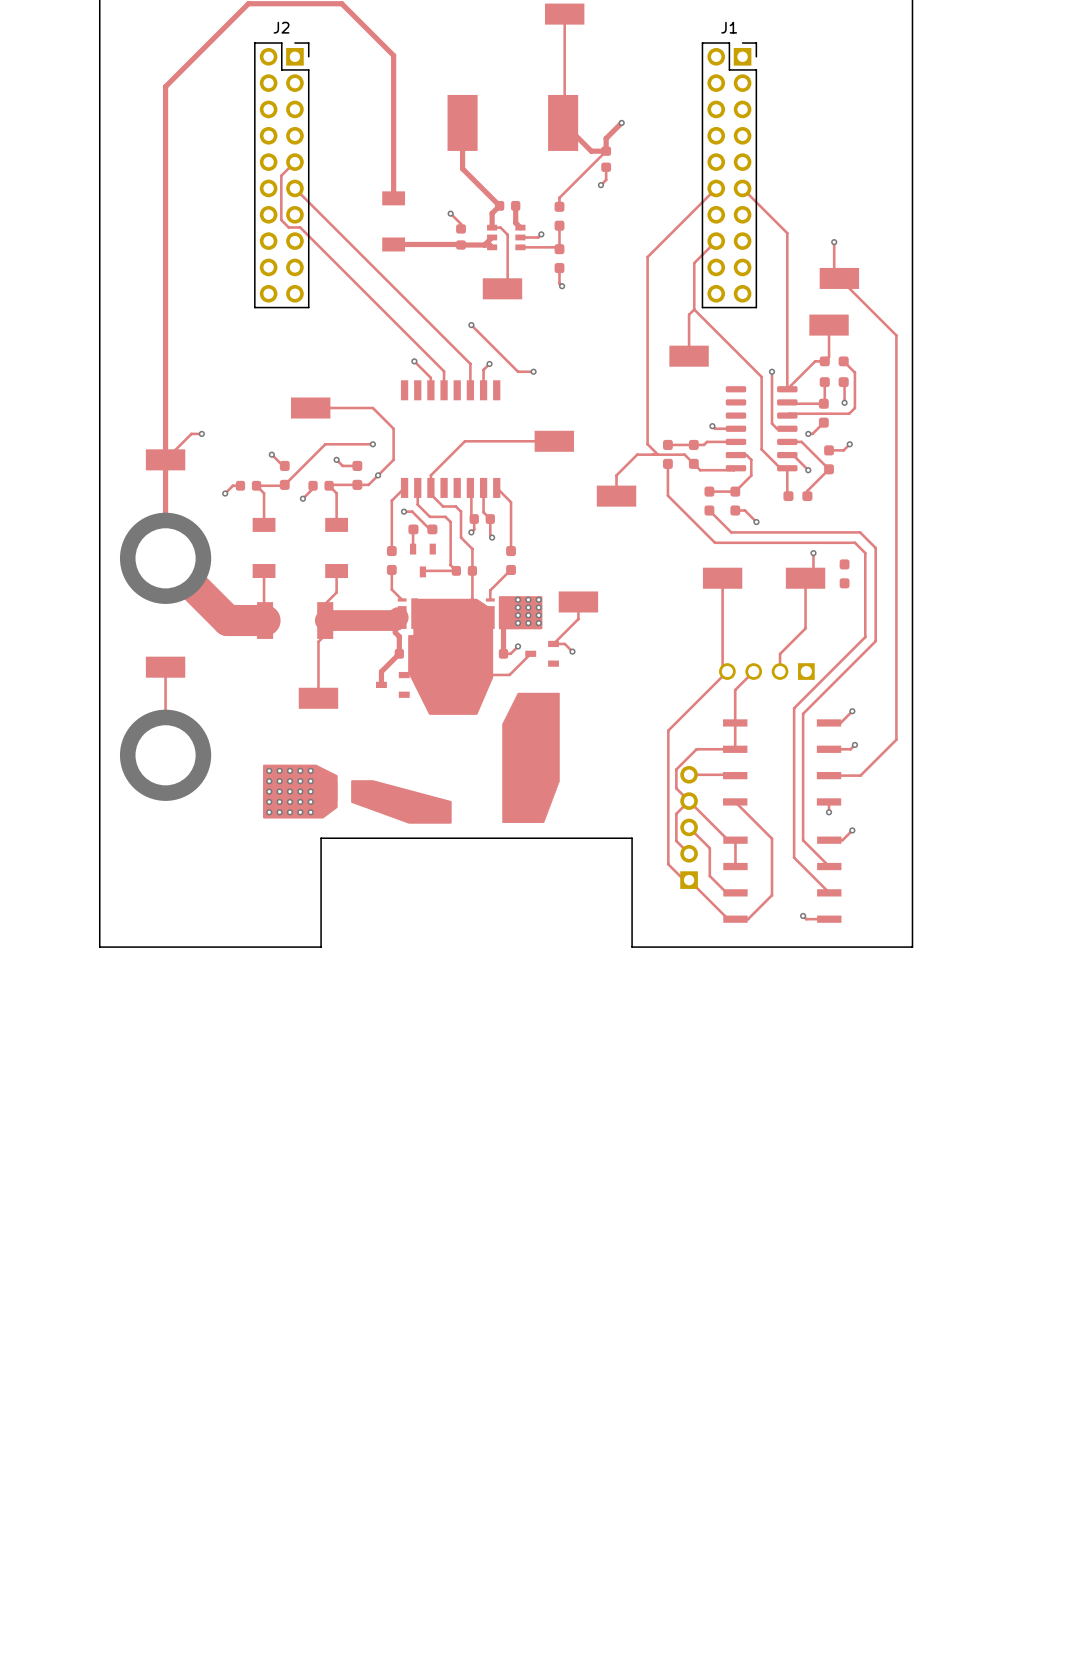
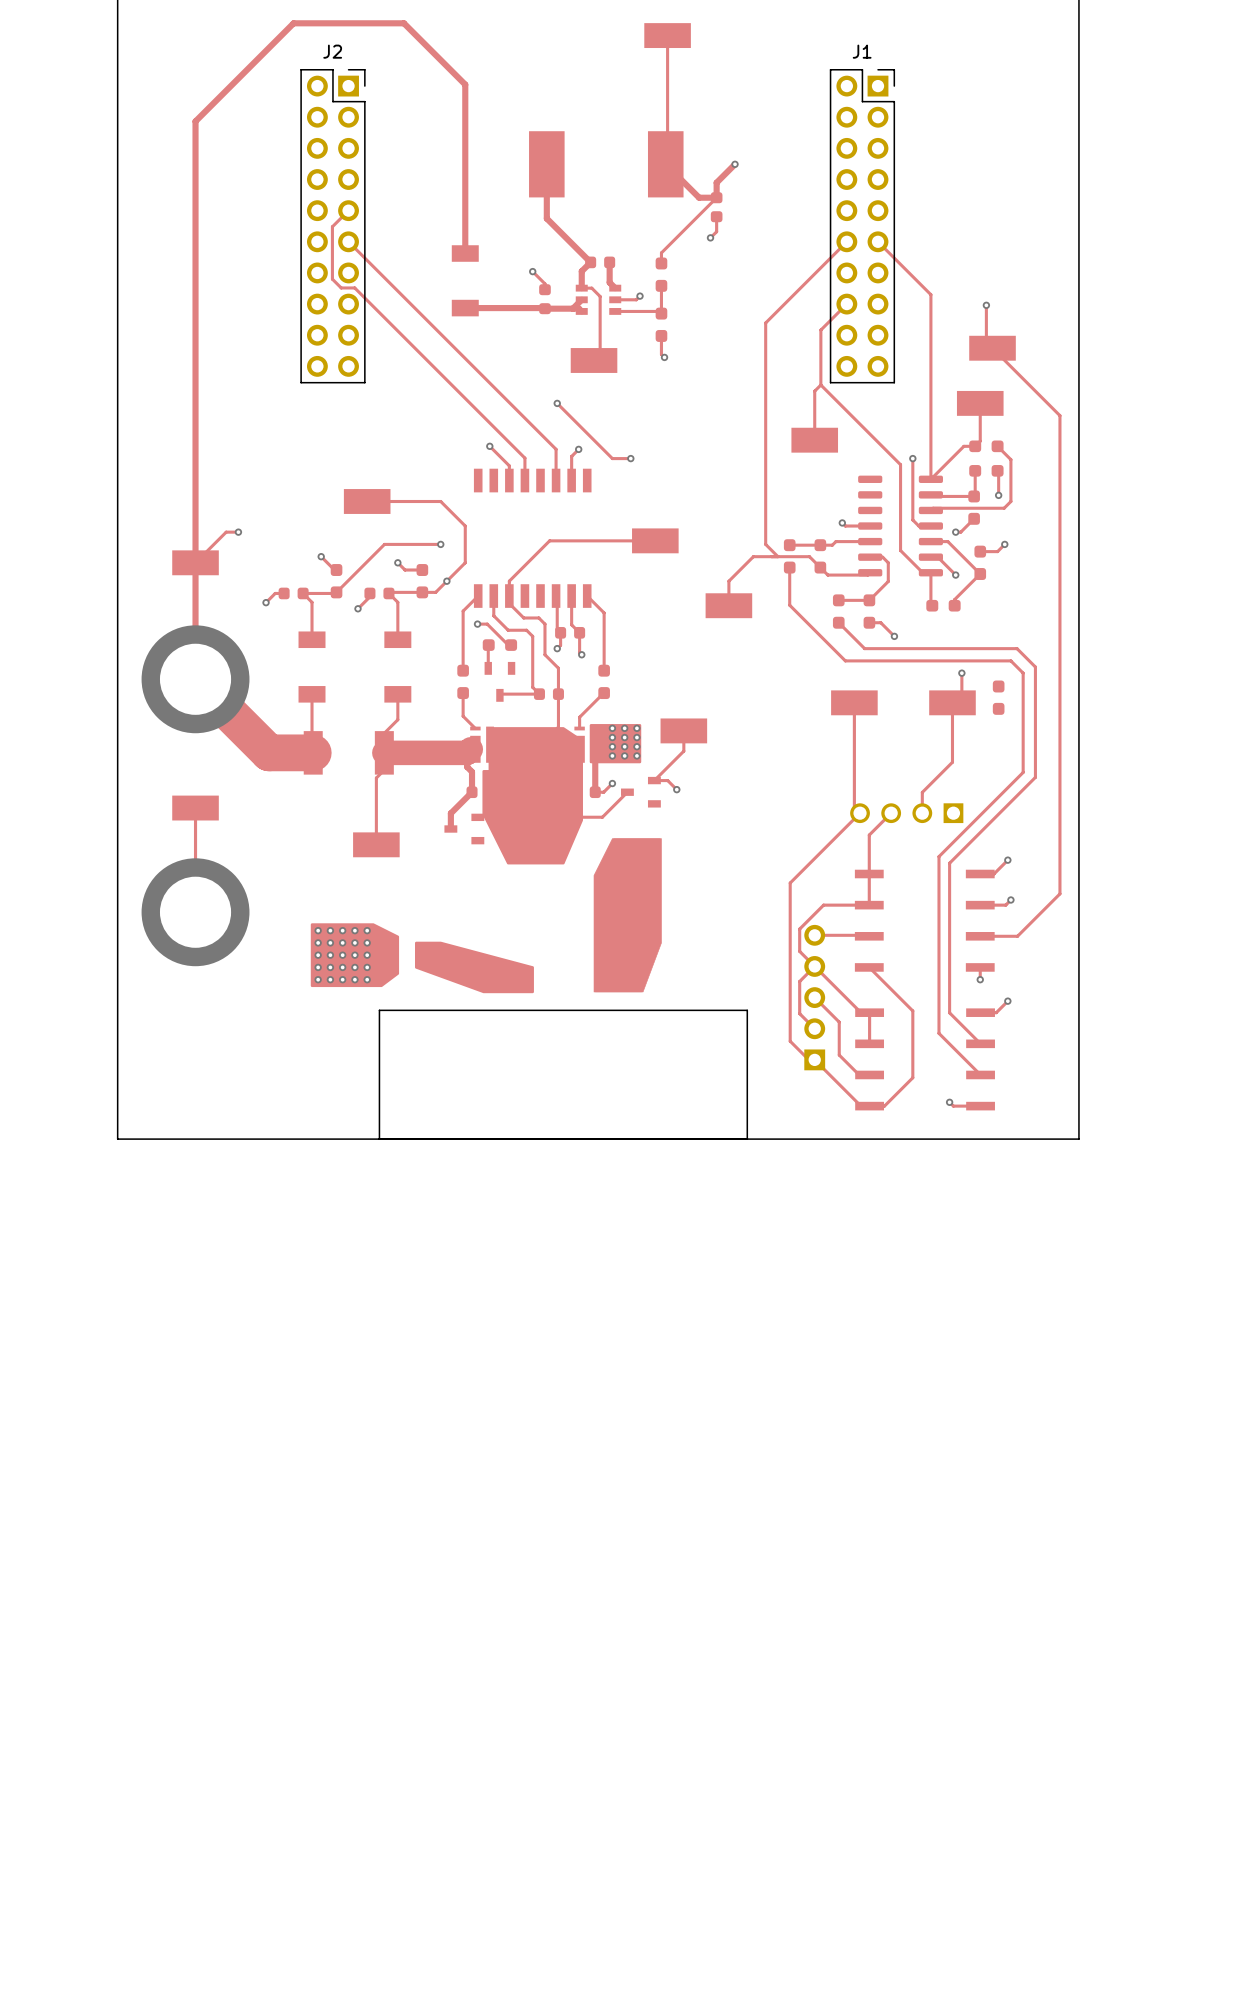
board edge: none -> (747, 1139) (379, 1139)

